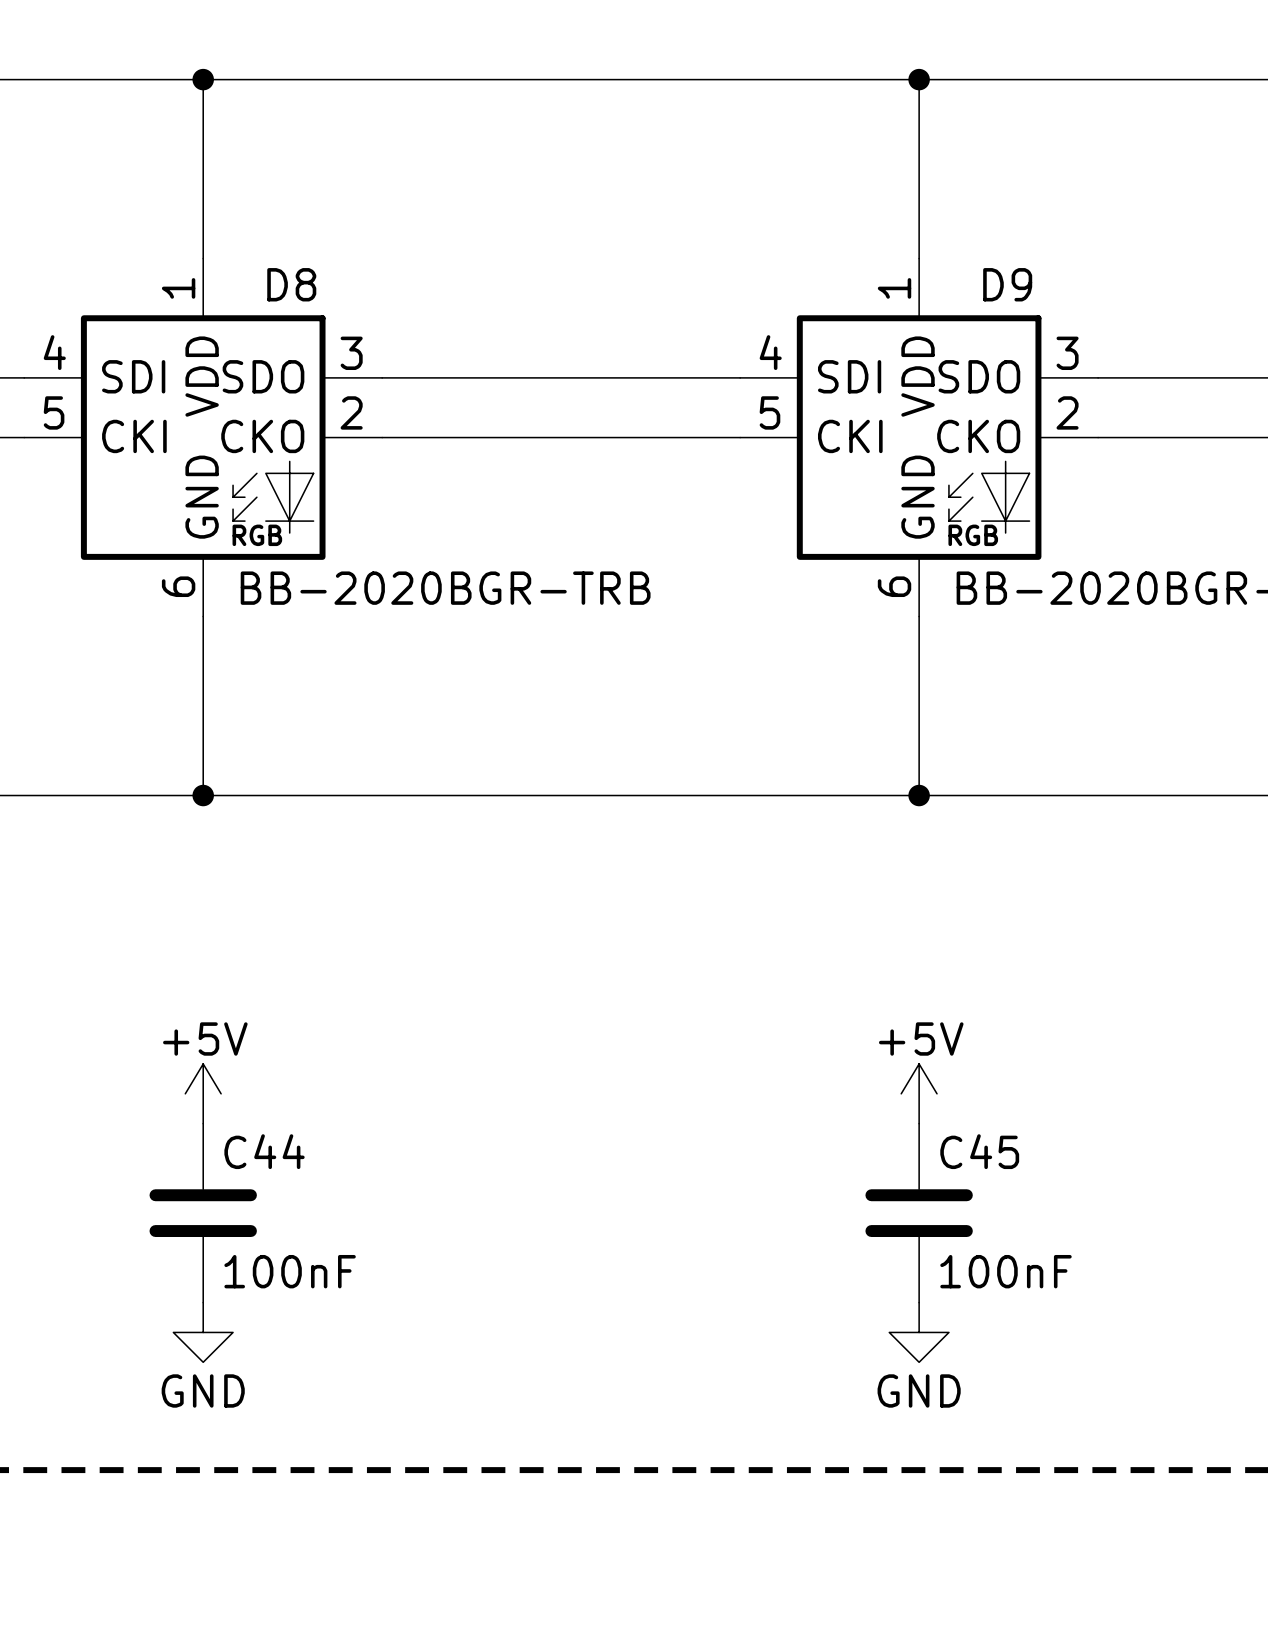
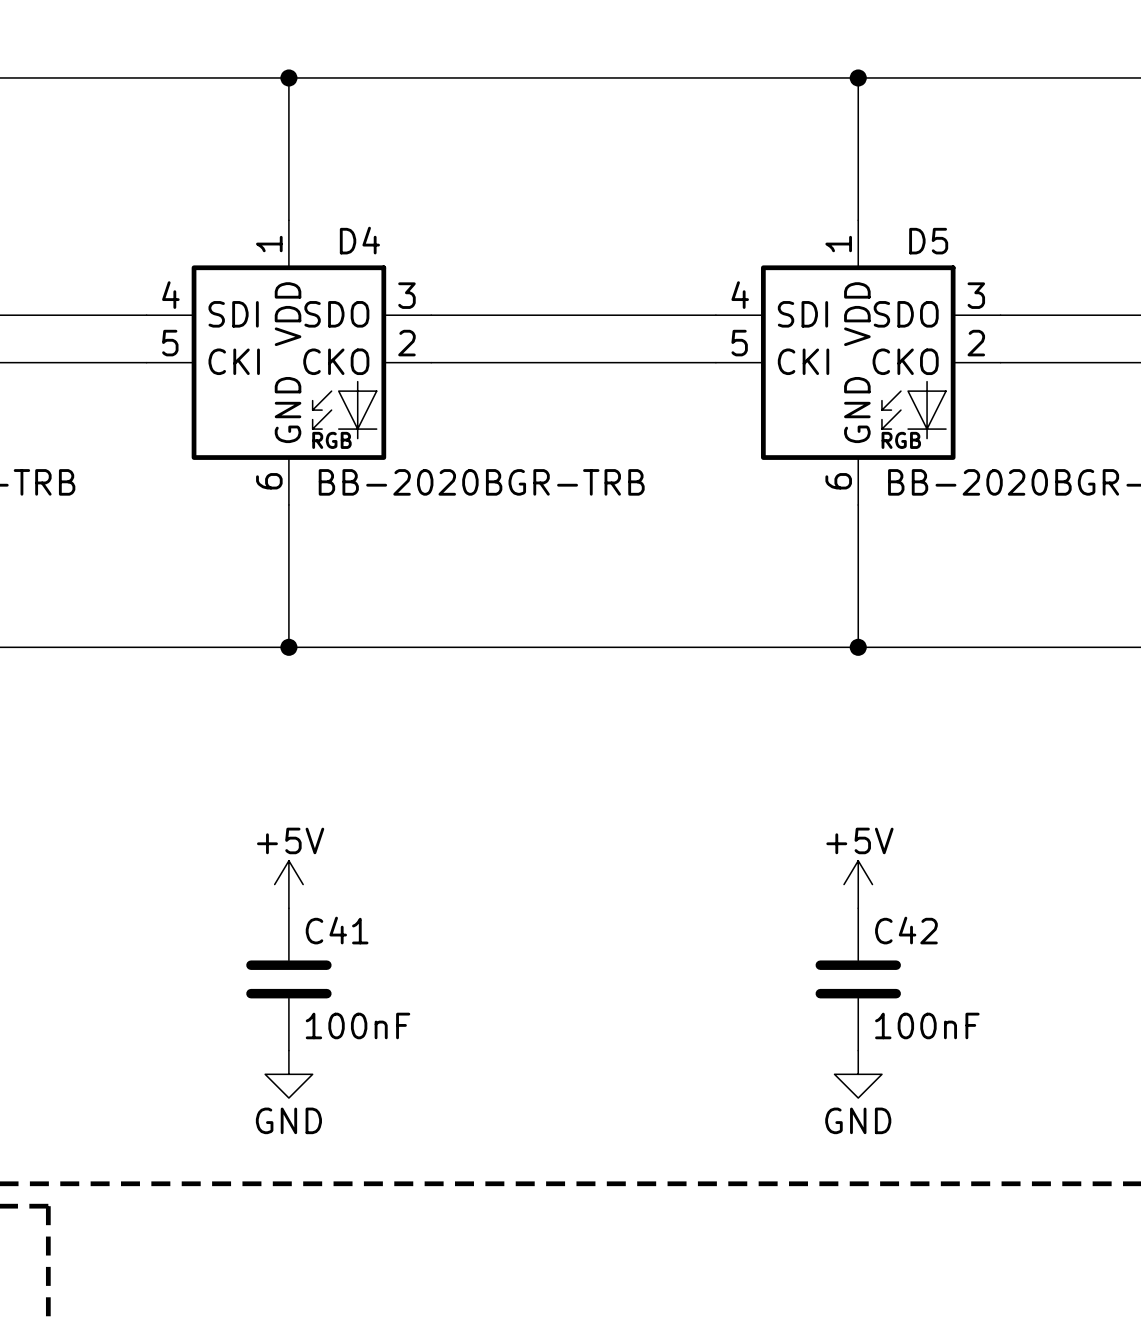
D8 name: D8 (291, 284) -> D4 (359, 240)
D9 name: D9 (1007, 284) -> D5 (928, 241)
C44 name: C44 (264, 1151) -> C41 (337, 930)
C45 name: C45 (979, 1151) -> C42 (906, 930)

